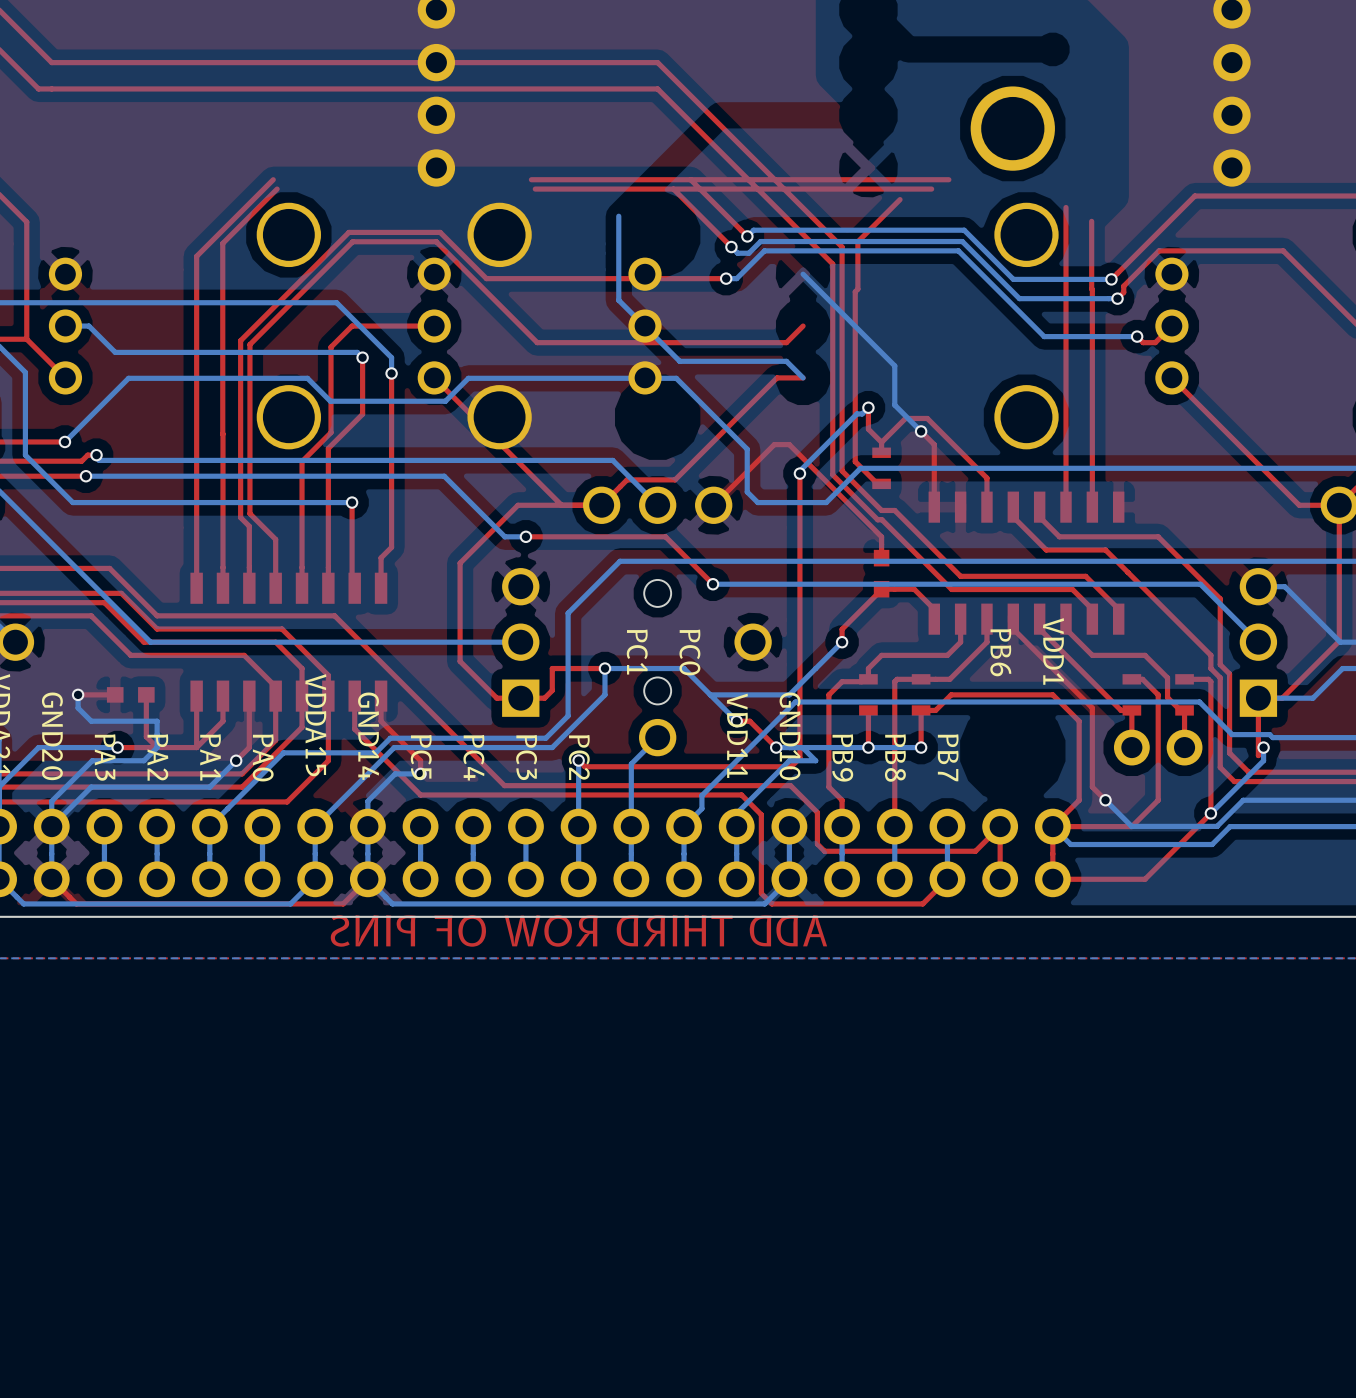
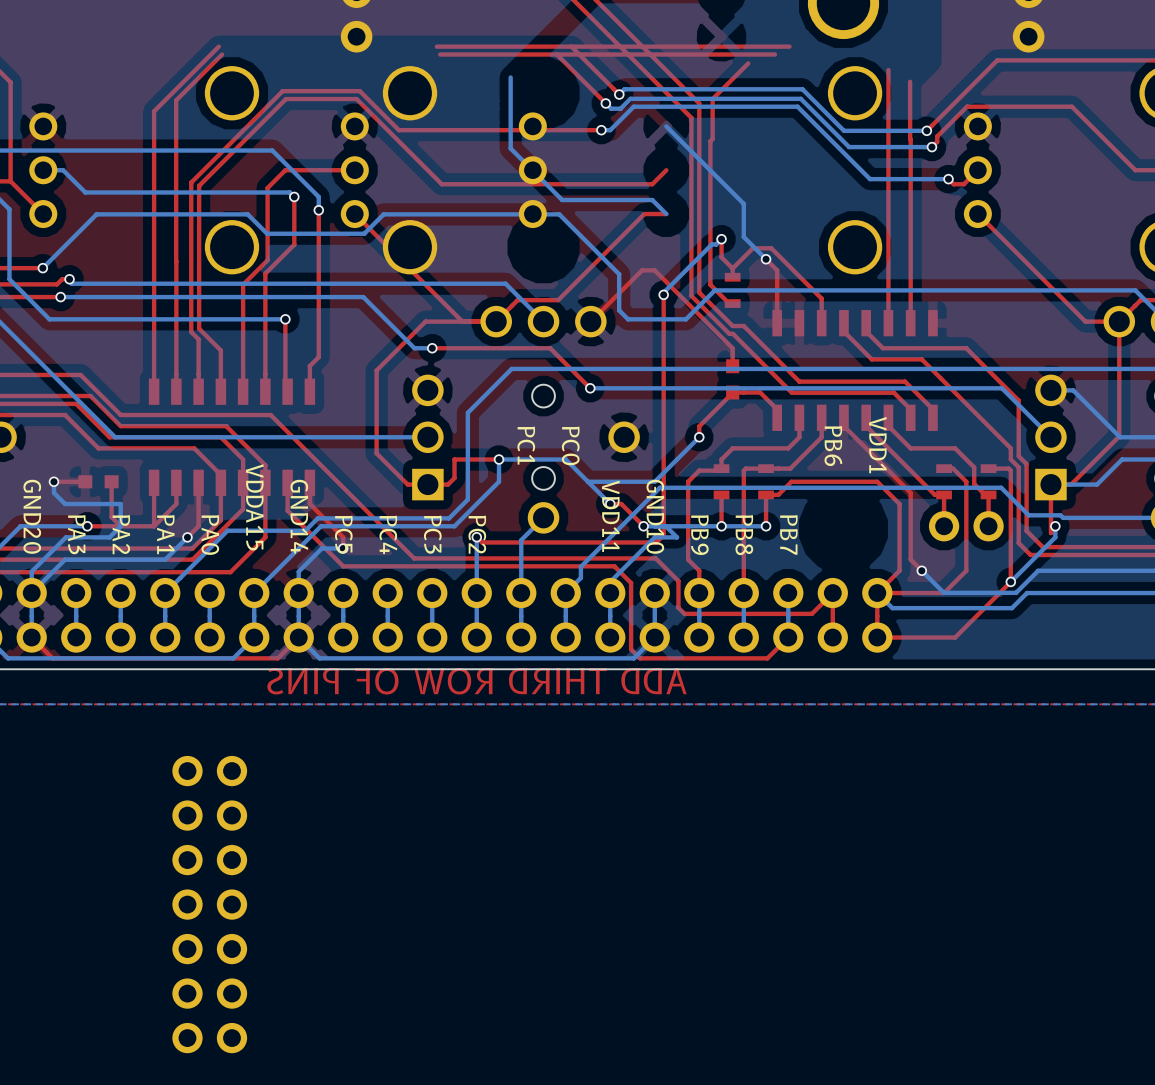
part: none -> (209, 771)
part: none -> (209, 815)
part: none -> (209, 860)
part: none -> (209, 904)
part: none -> (209, 949)
part: none -> (209, 993)
part: none -> (209, 1038)

